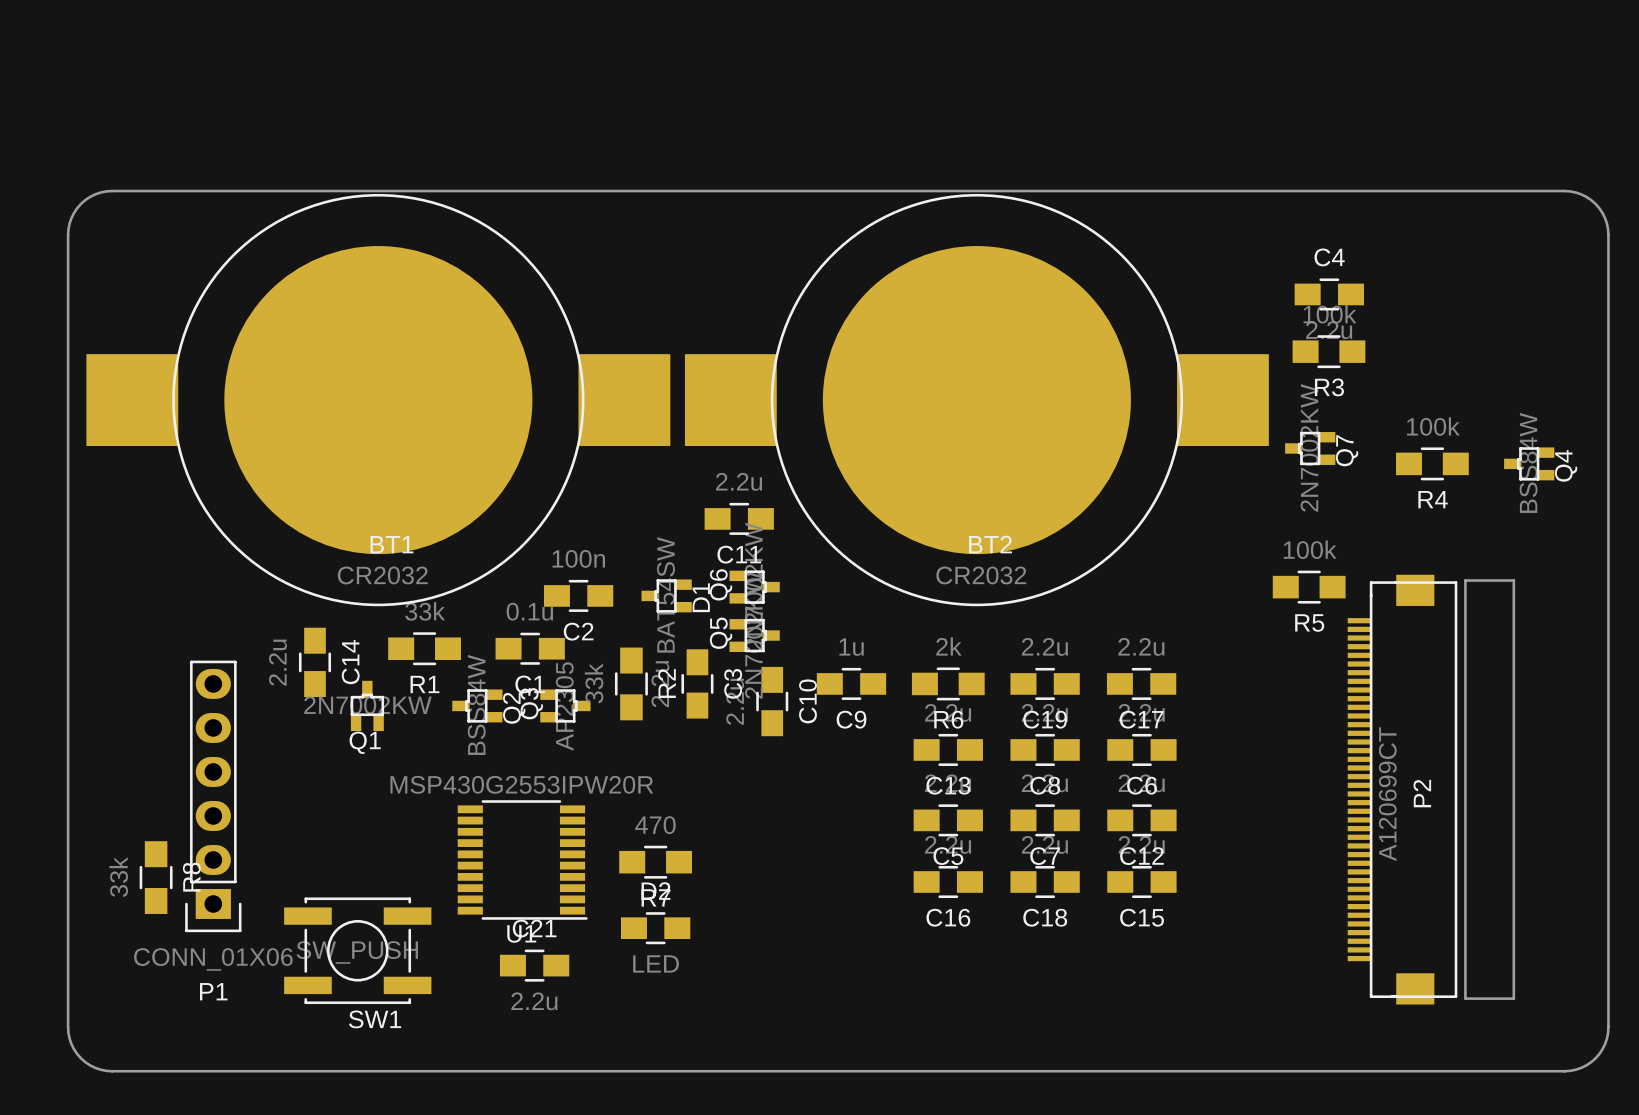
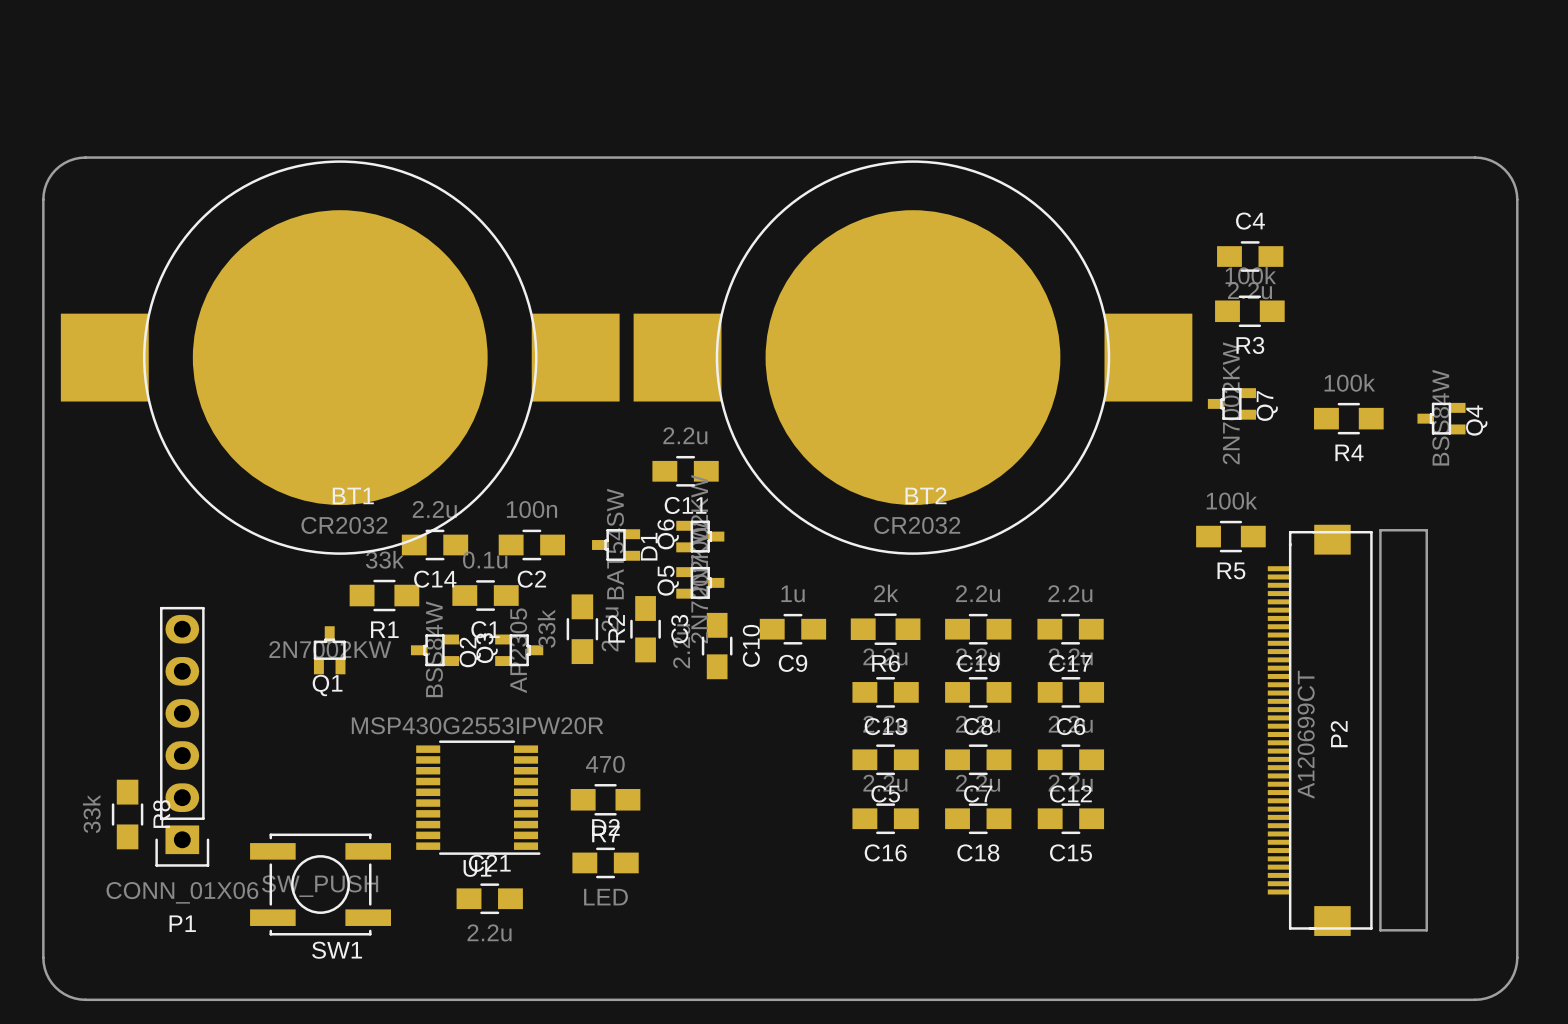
C14 rotation: 0° (314, 662) -> 90° clockwise (434, 544)
C14 position: (314, 662) -> (434, 544)

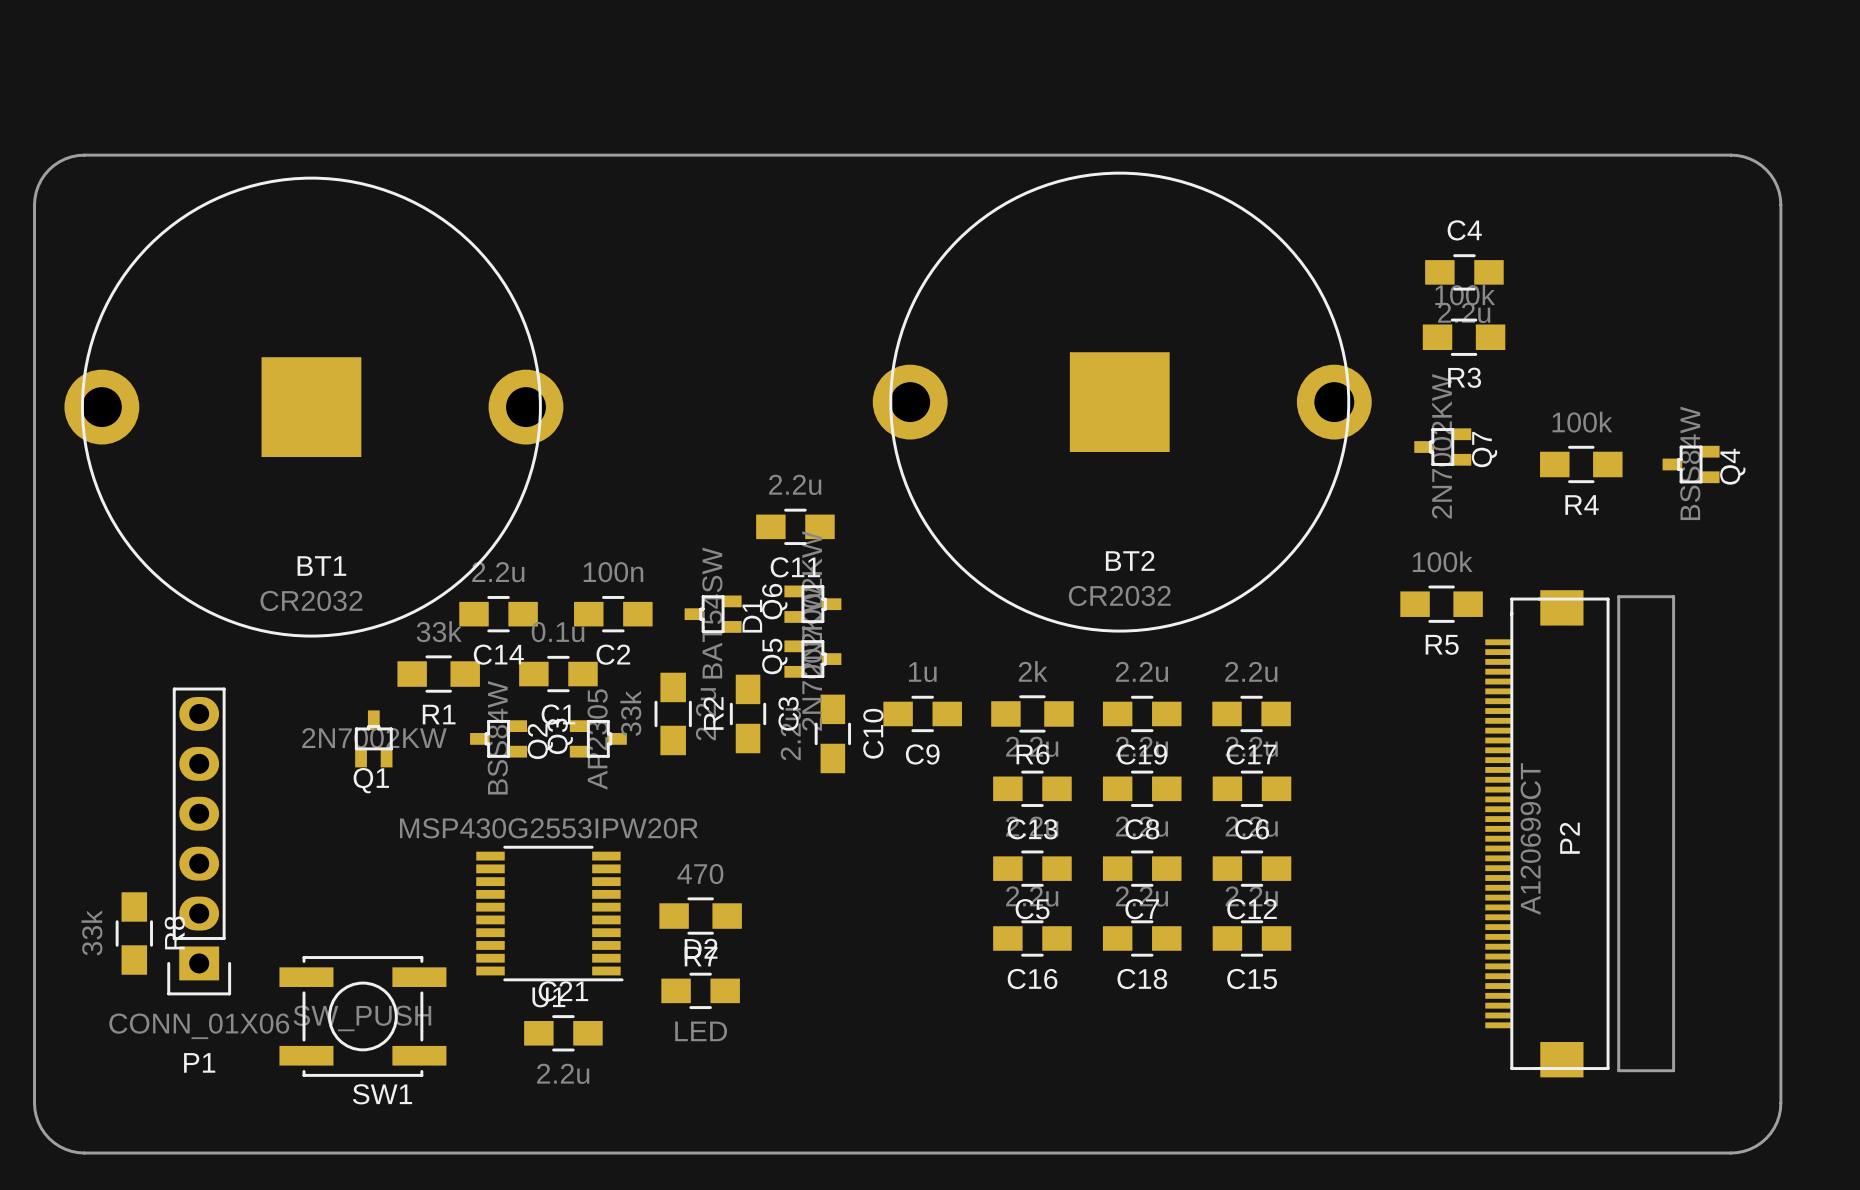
BT1 footprint: [60, 160, 620, 555] -> [64, 176, 564, 638]
BT2 footprint: [633, 160, 1193, 555] -> [872, 171, 1372, 633]

